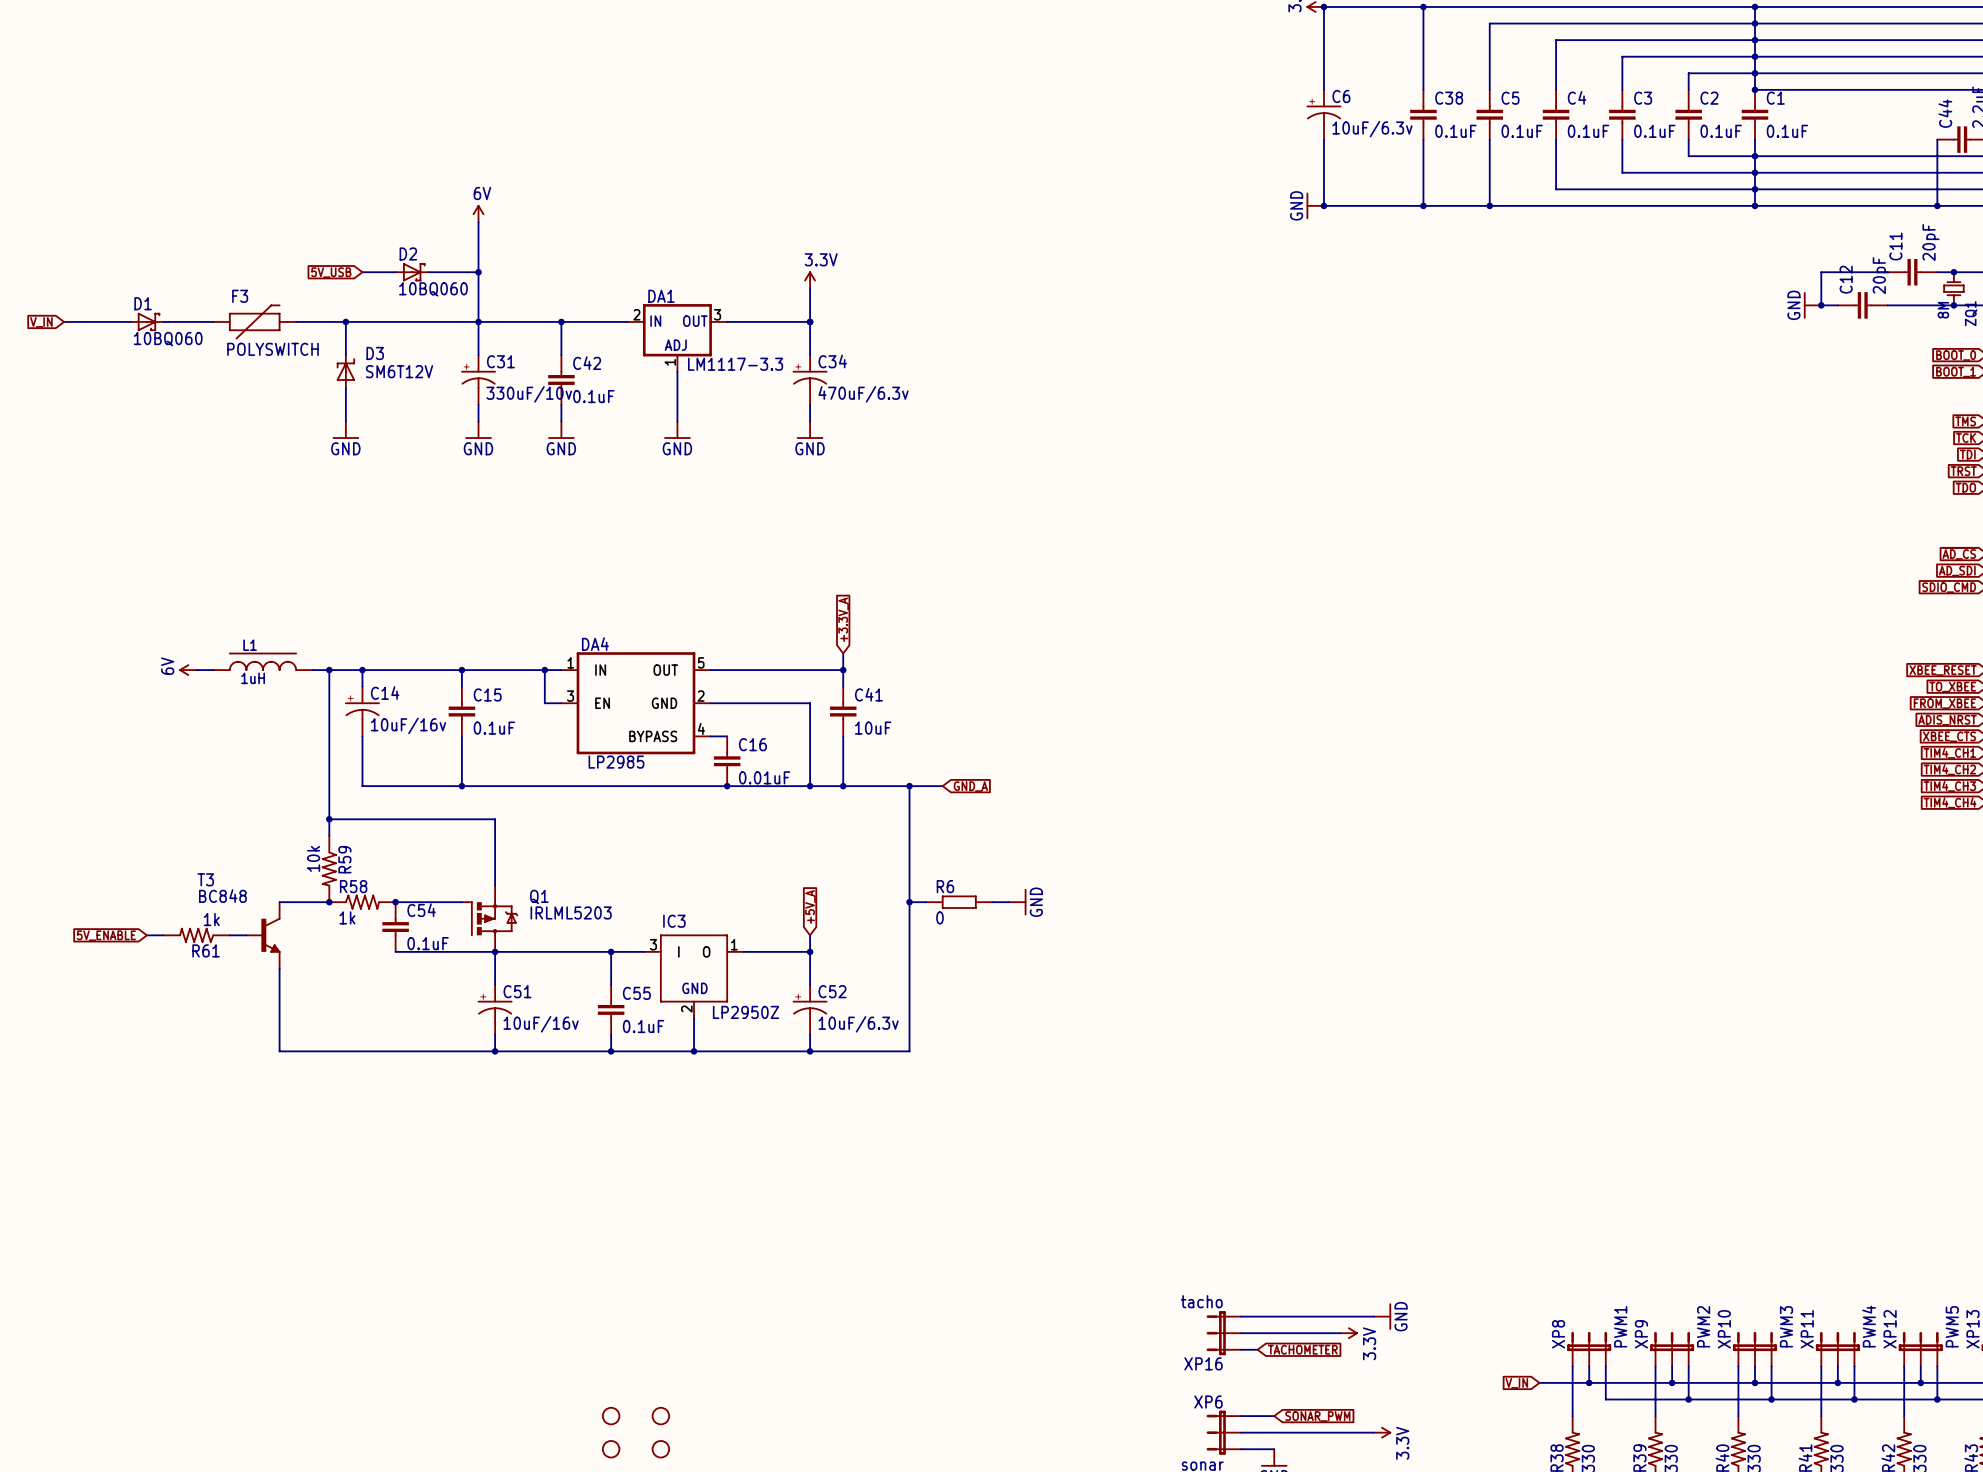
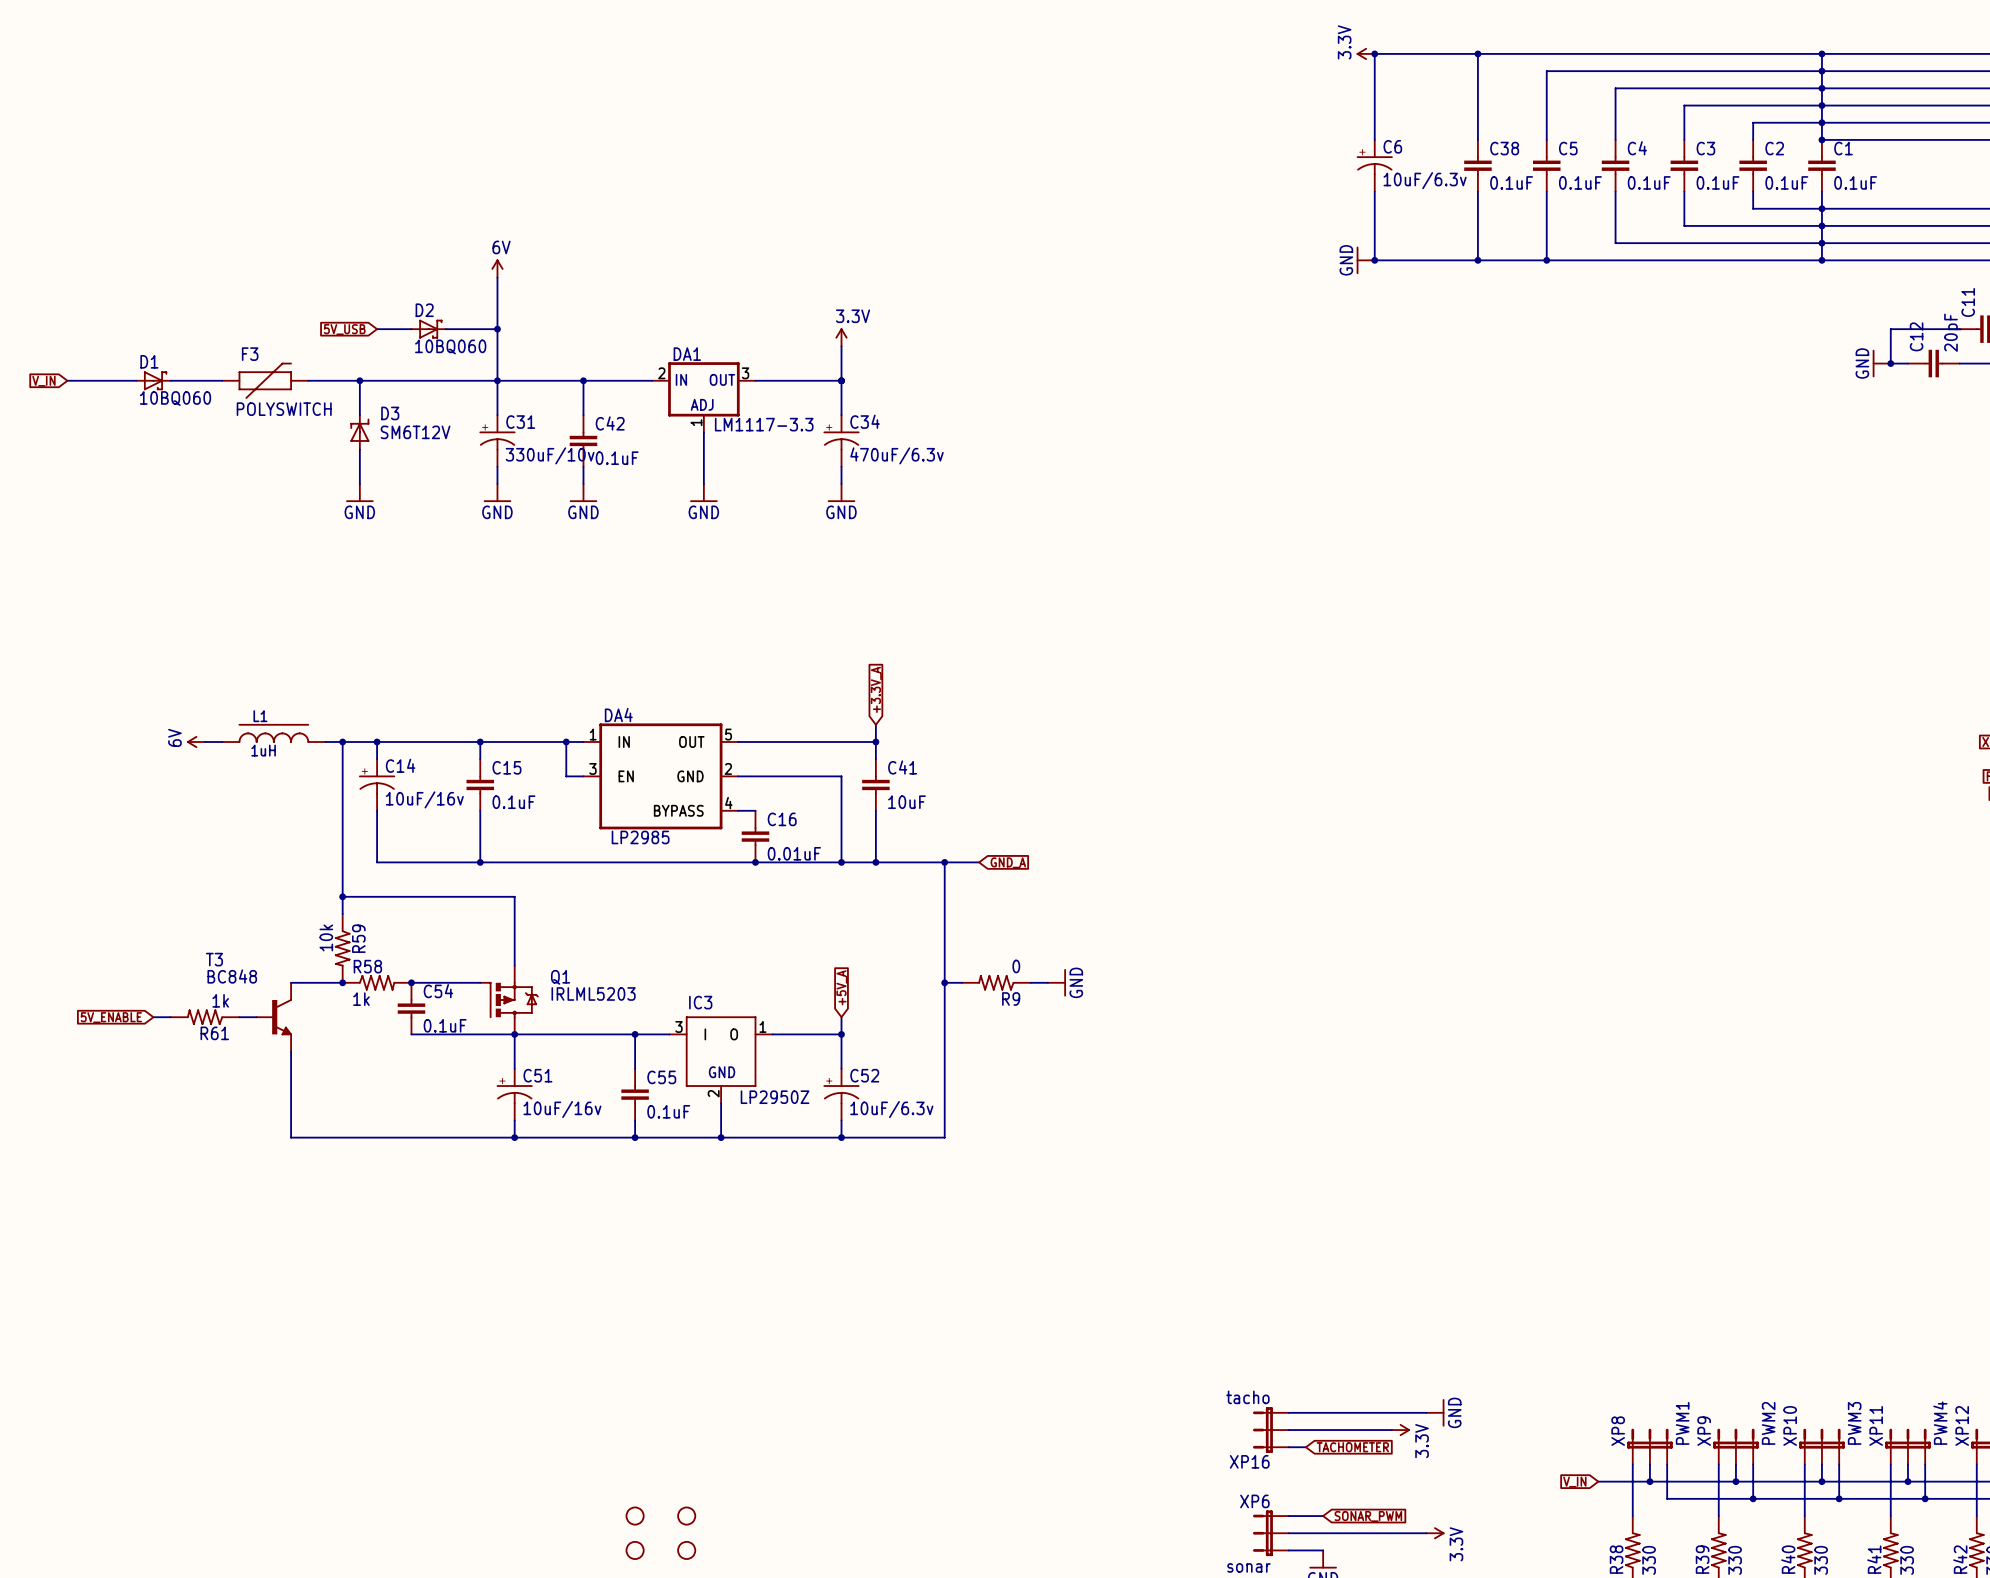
R6: 0 (959, 902) -> none
R9: none -> 0 (996, 982)

